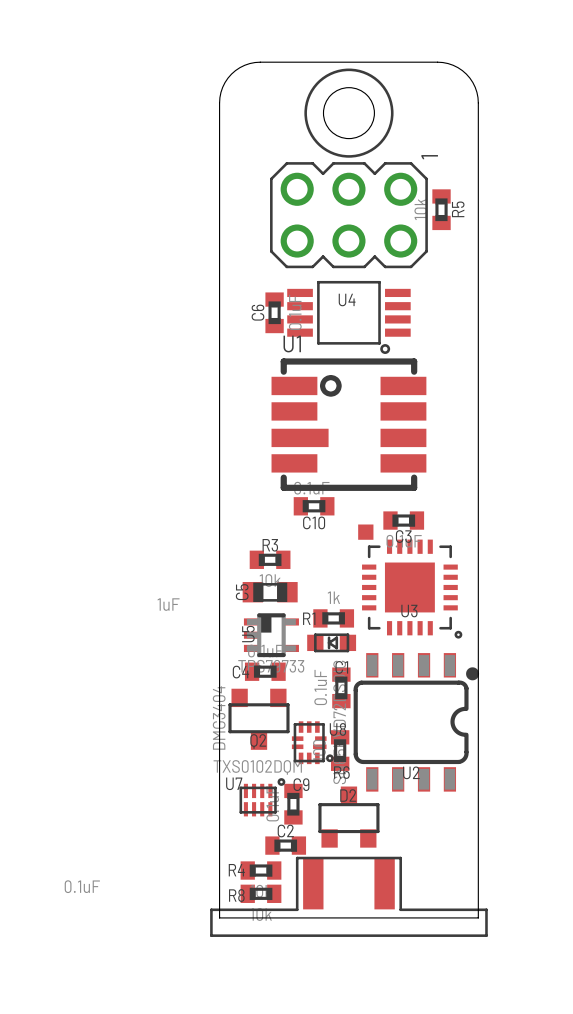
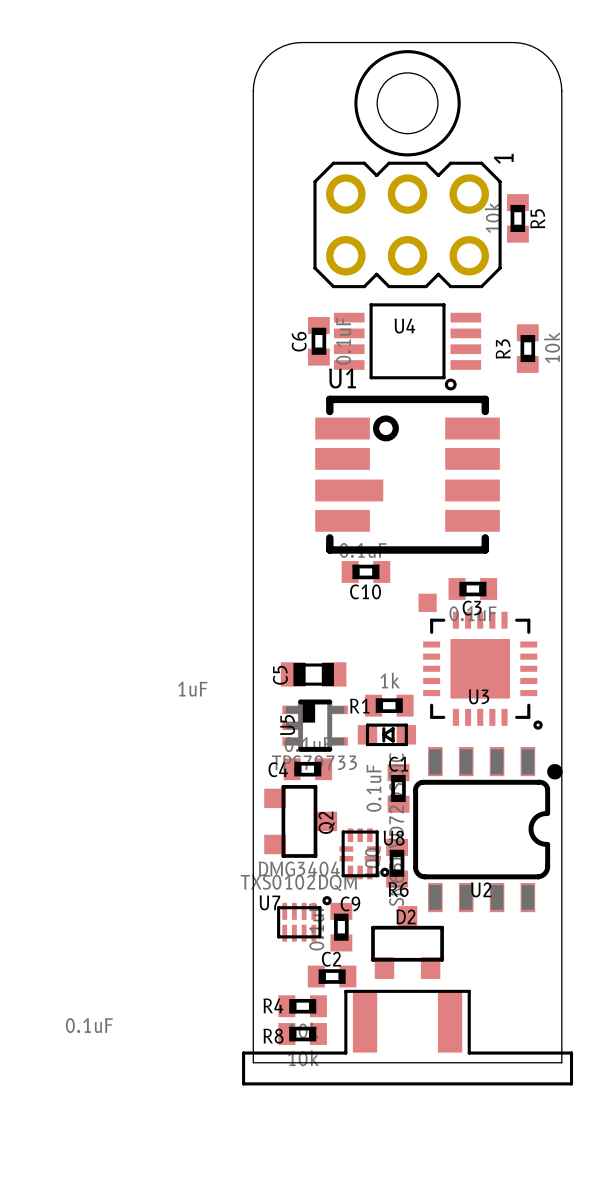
R3 rotation: 0° (270, 559) -> 90° clockwise (527, 348)
R3 position: (270, 559) -> (527, 348)
Q2 rotation: 0° (259, 719) -> 90° counterclockwise (300, 821)

